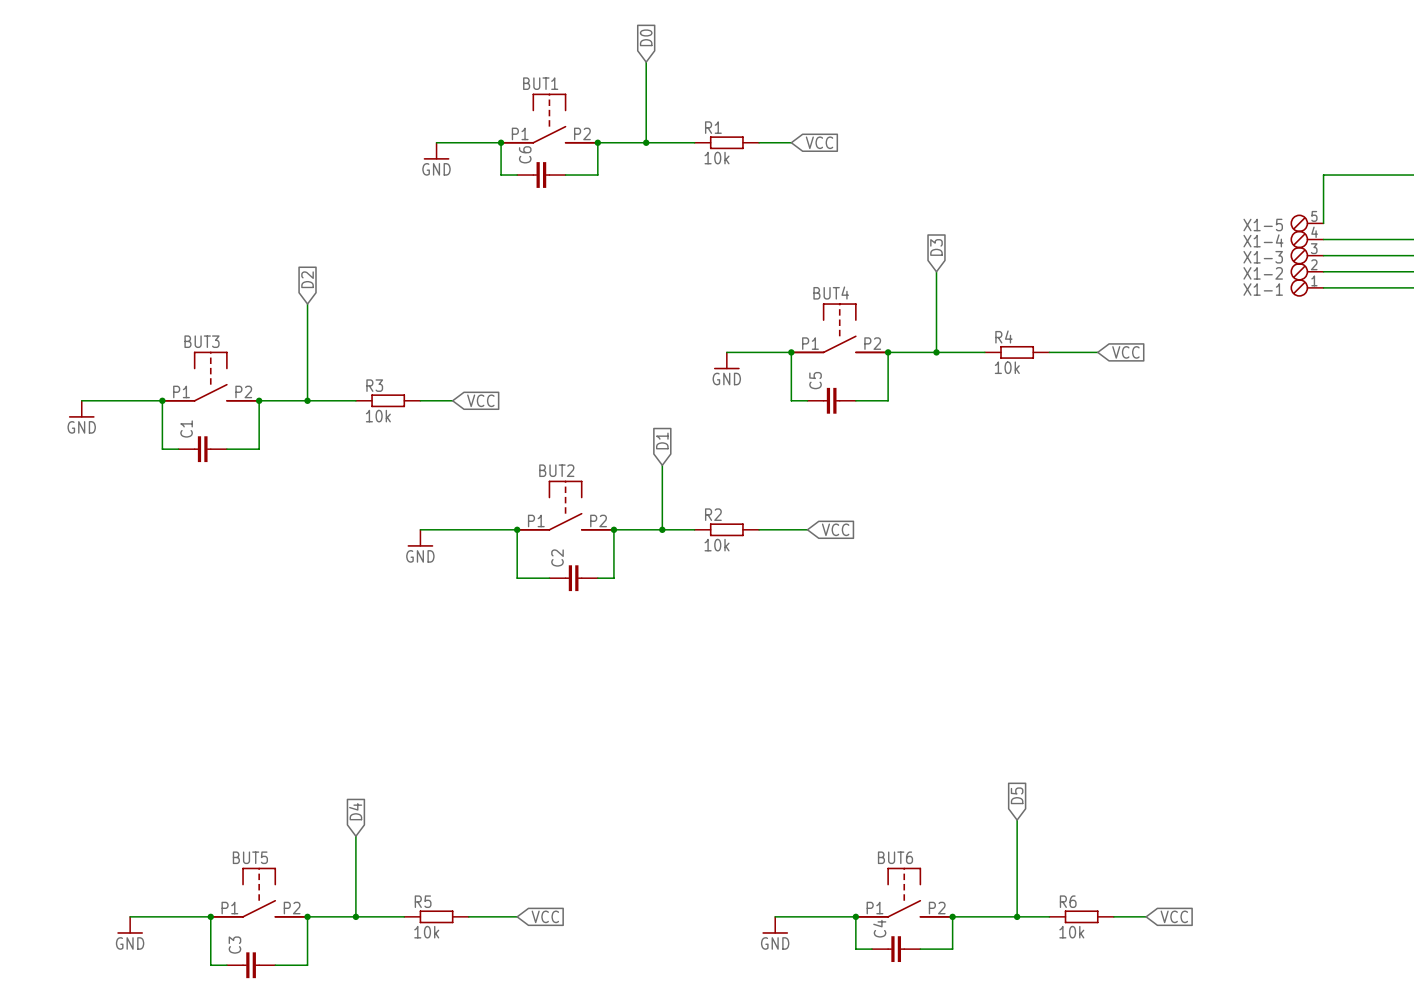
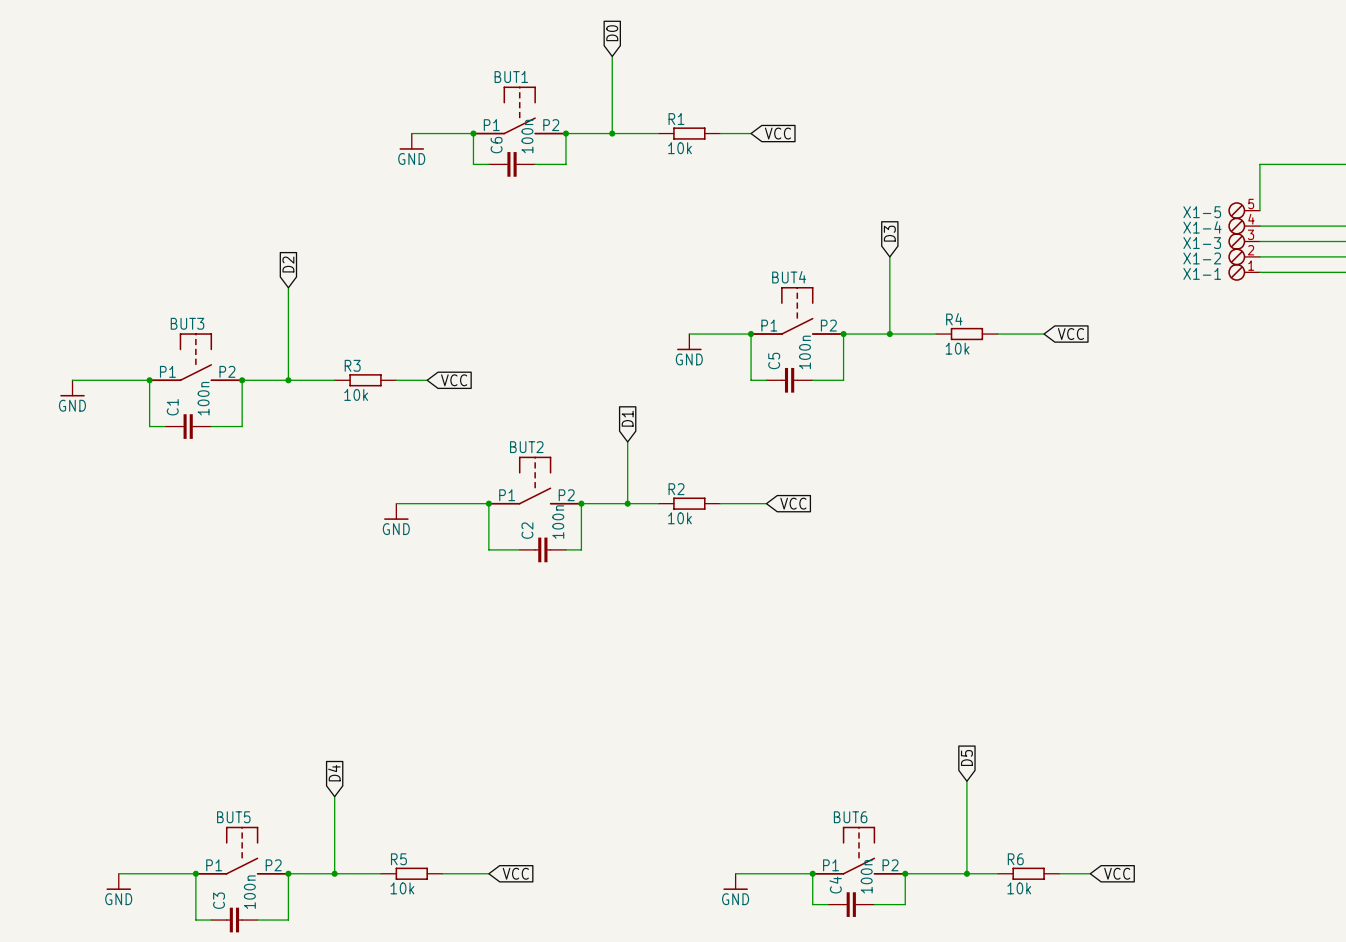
C6 value: none -> 100n (527, 136)
C5 value: none -> 100n (805, 352)
C1 value: none -> 100n (203, 398)
C2 value: none -> 100n (558, 522)
C4 value: none -> 100n (866, 876)
C3 value: none -> 100n (249, 892)

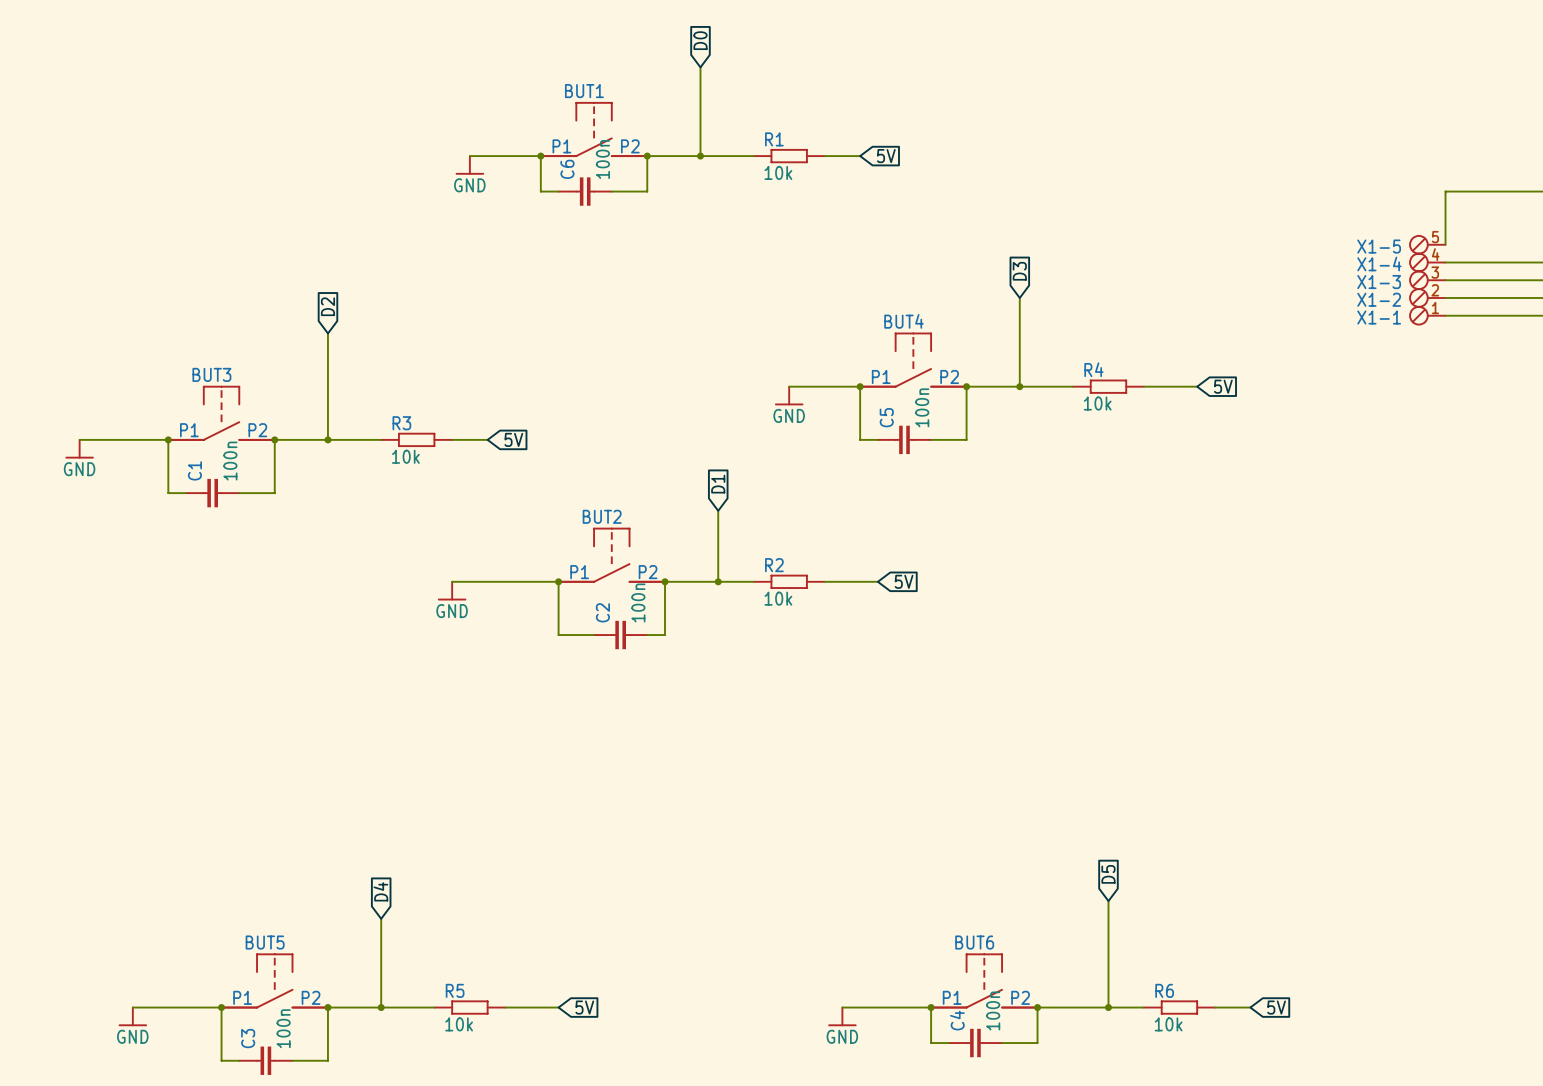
global label: VCC (777, 133) -> 5V (886, 156)
global label: VCC (1070, 334) -> 5V (1223, 386)
global label: VCC (454, 380) -> 5V (513, 439)
global label: VCC (793, 503) -> 5V (904, 581)
global label: VCC (515, 873) -> 5V (584, 1007)
global label: VCC (1117, 873) -> 5V (1276, 1007)

